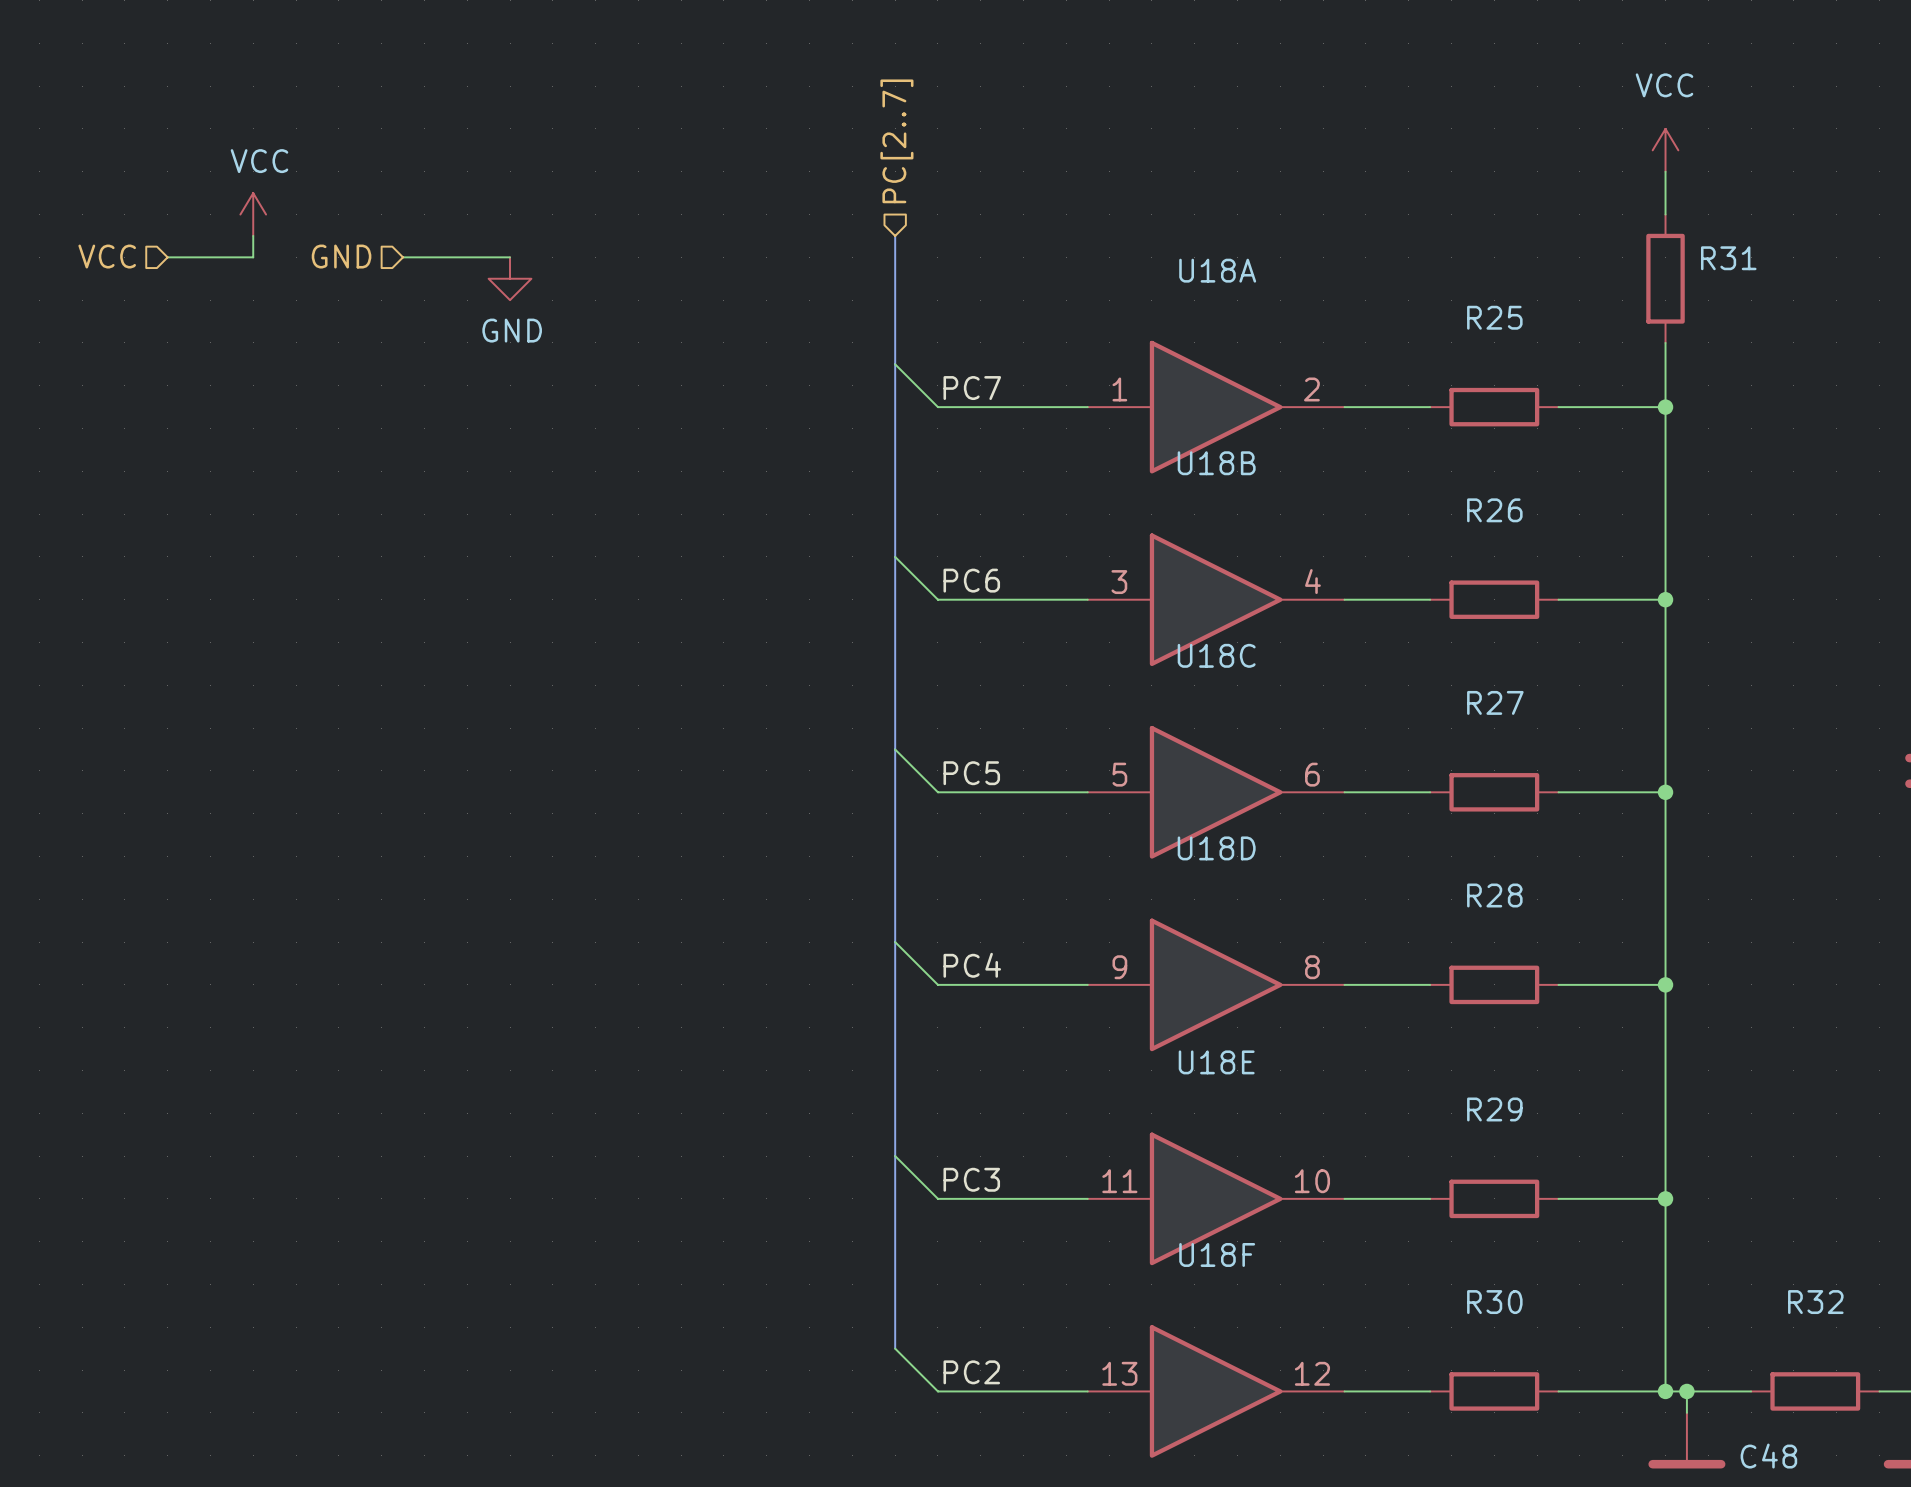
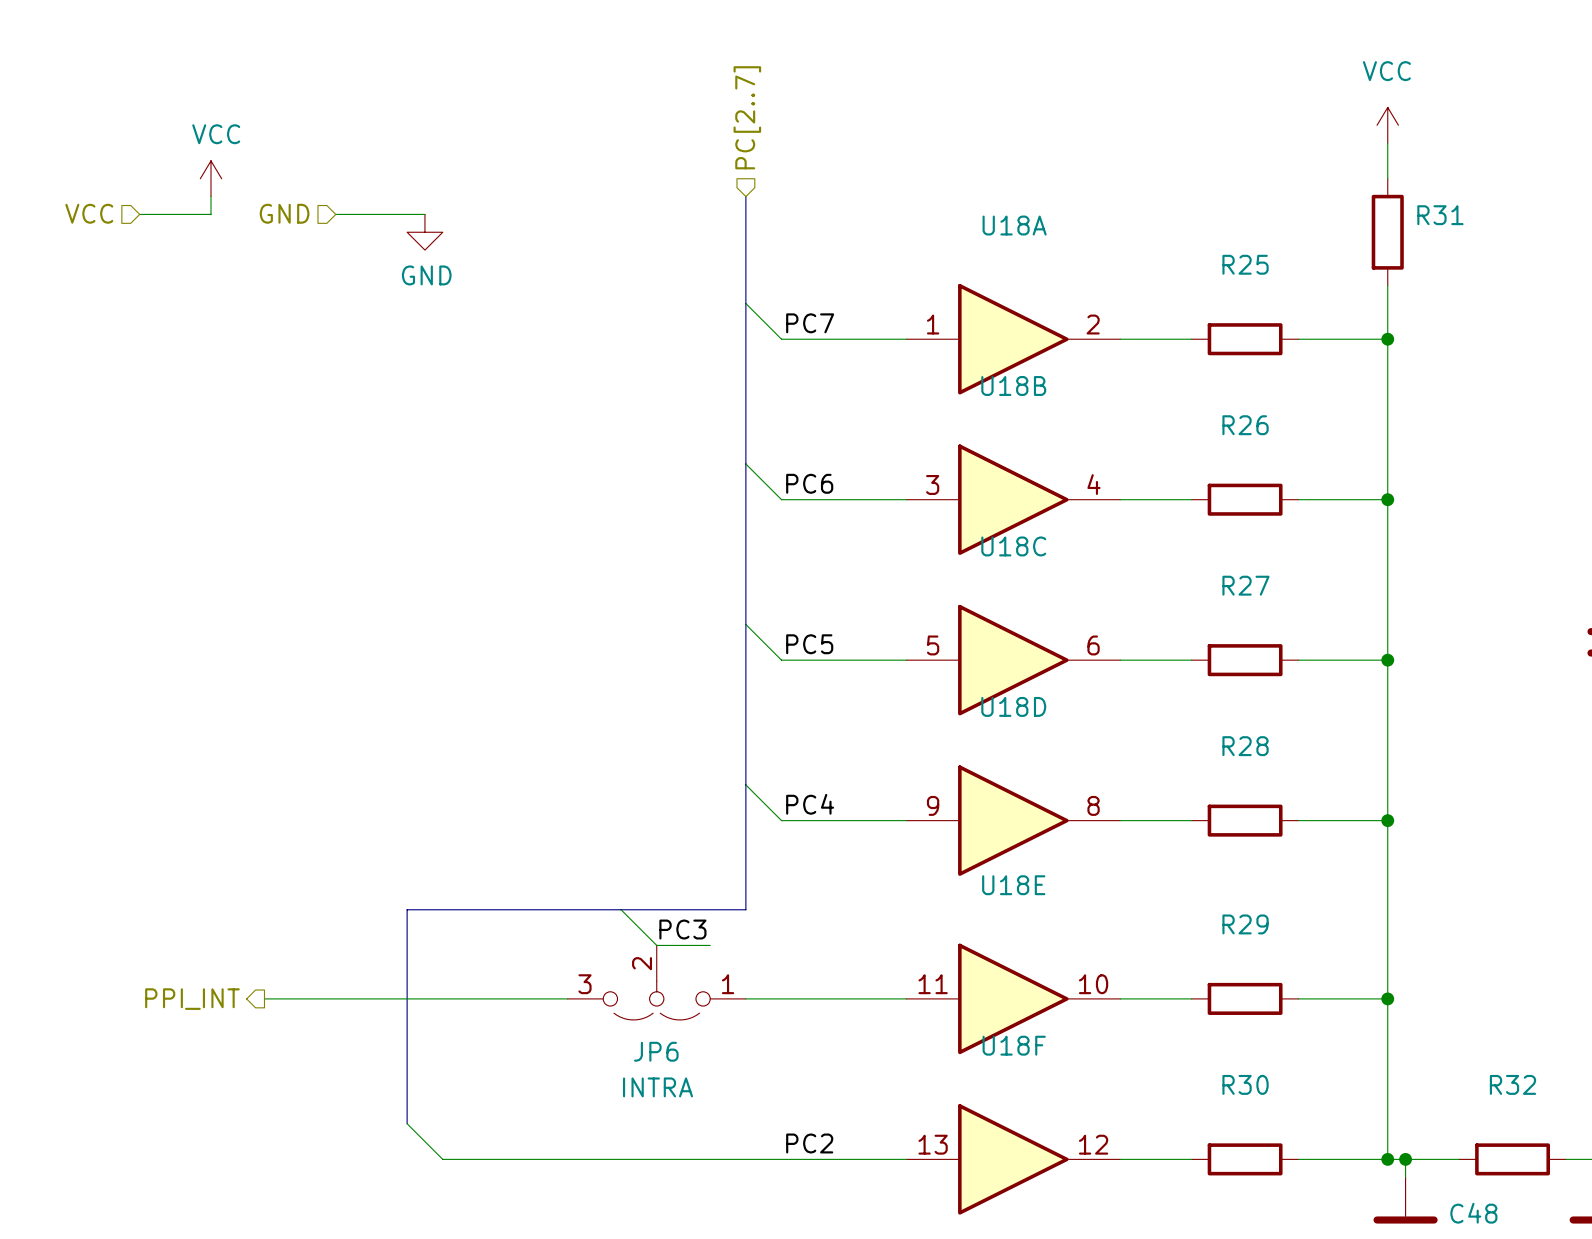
wire: none -> (621, 909) (656, 945) (710, 945)
bus: (895, 1091) (895, 1348) -> (745, 909) (407, 909) (407, 1123)
wire: (895, 1156) (937, 1198) -> (745, 998) (781, 998)
JP6: none -> INTRA (656, 982)
label position: PC3 (971, 1179) -> PC3 (682, 929)
wire: none -> (264, 998) (567, 998)
hierarchical label: none -> PPI_INT (192, 999)
wire: (895, 1348) (937, 1391) -> (407, 1123) (442, 1159) (781, 1159)

